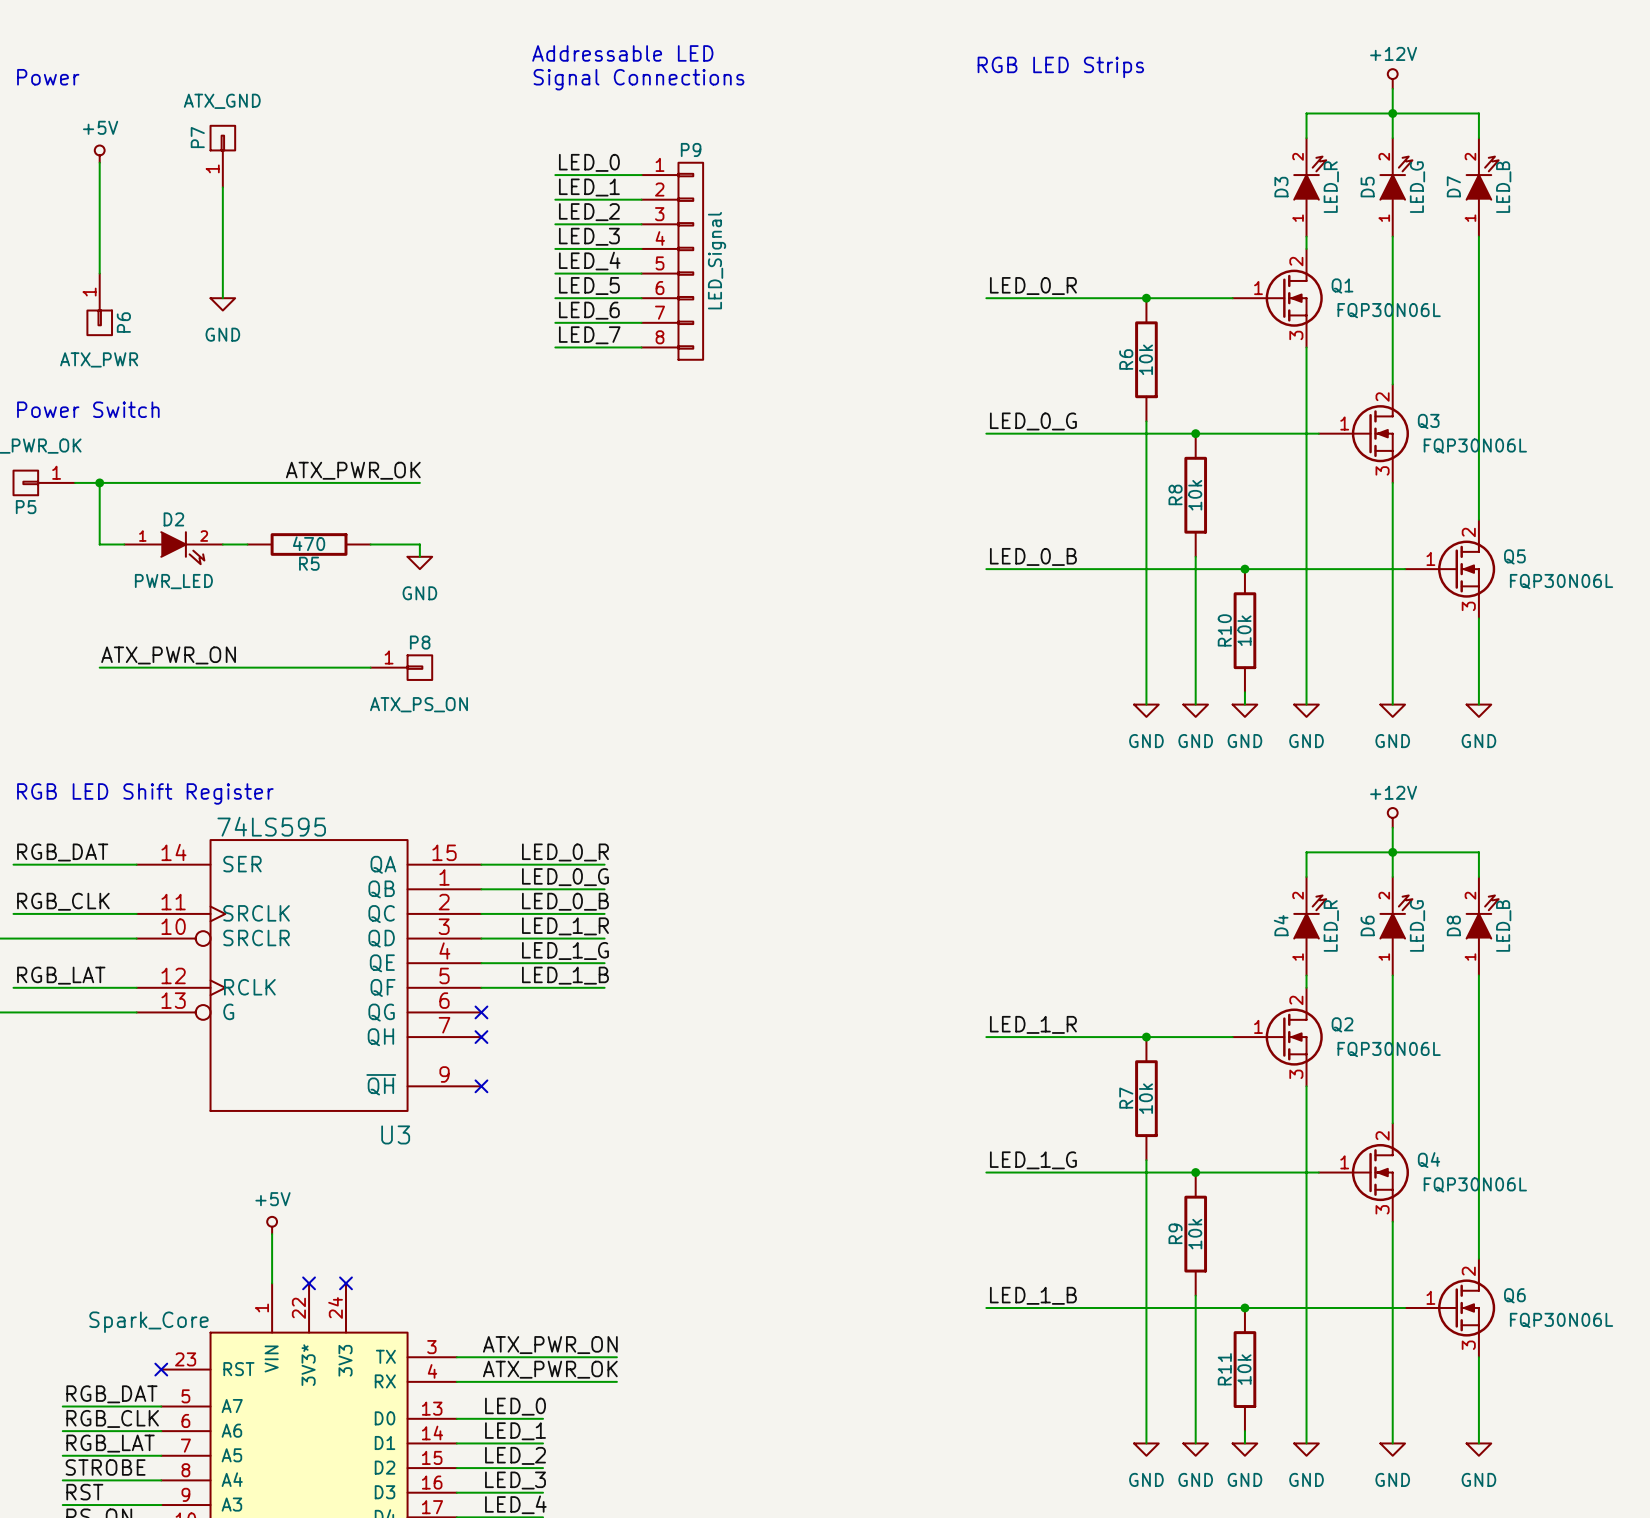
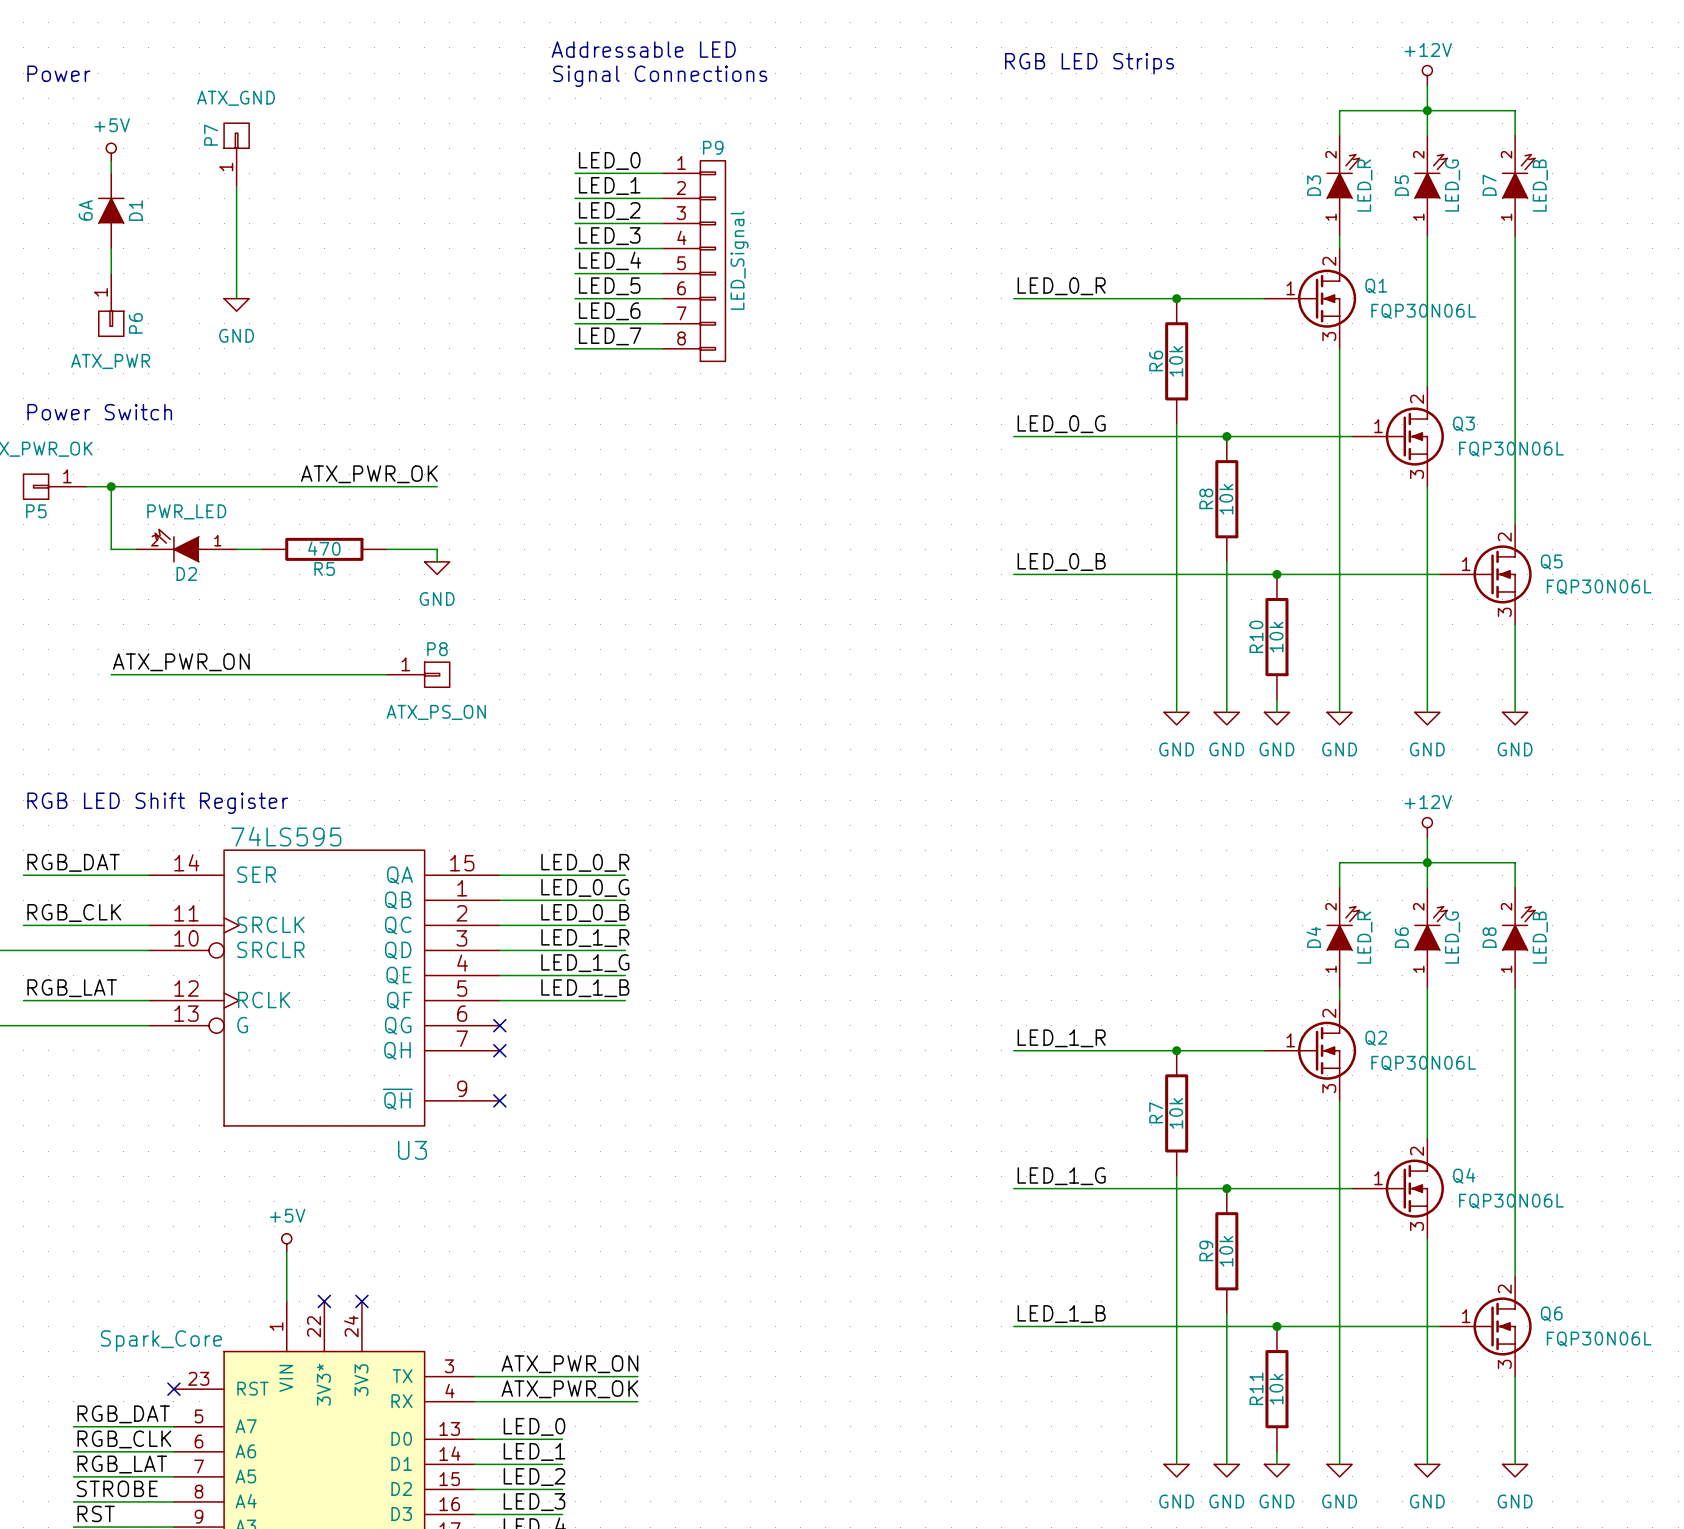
D1: none -> 6A (111, 210)
D2 rotation: 0° (182, 548) -> 180° (177, 545)

